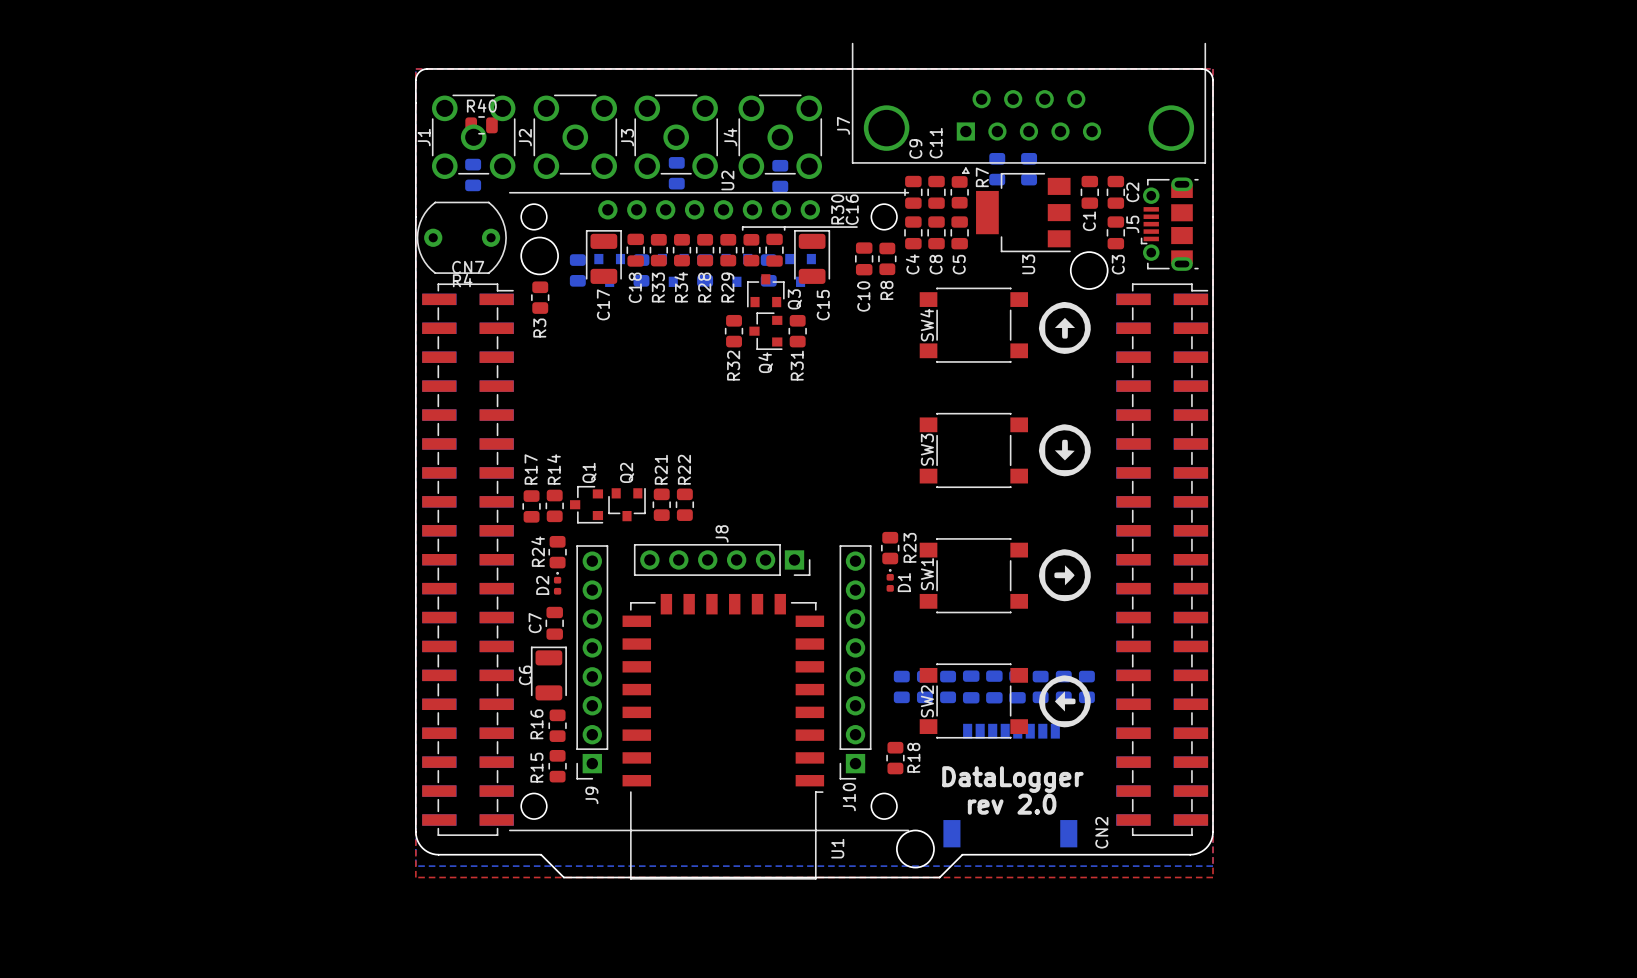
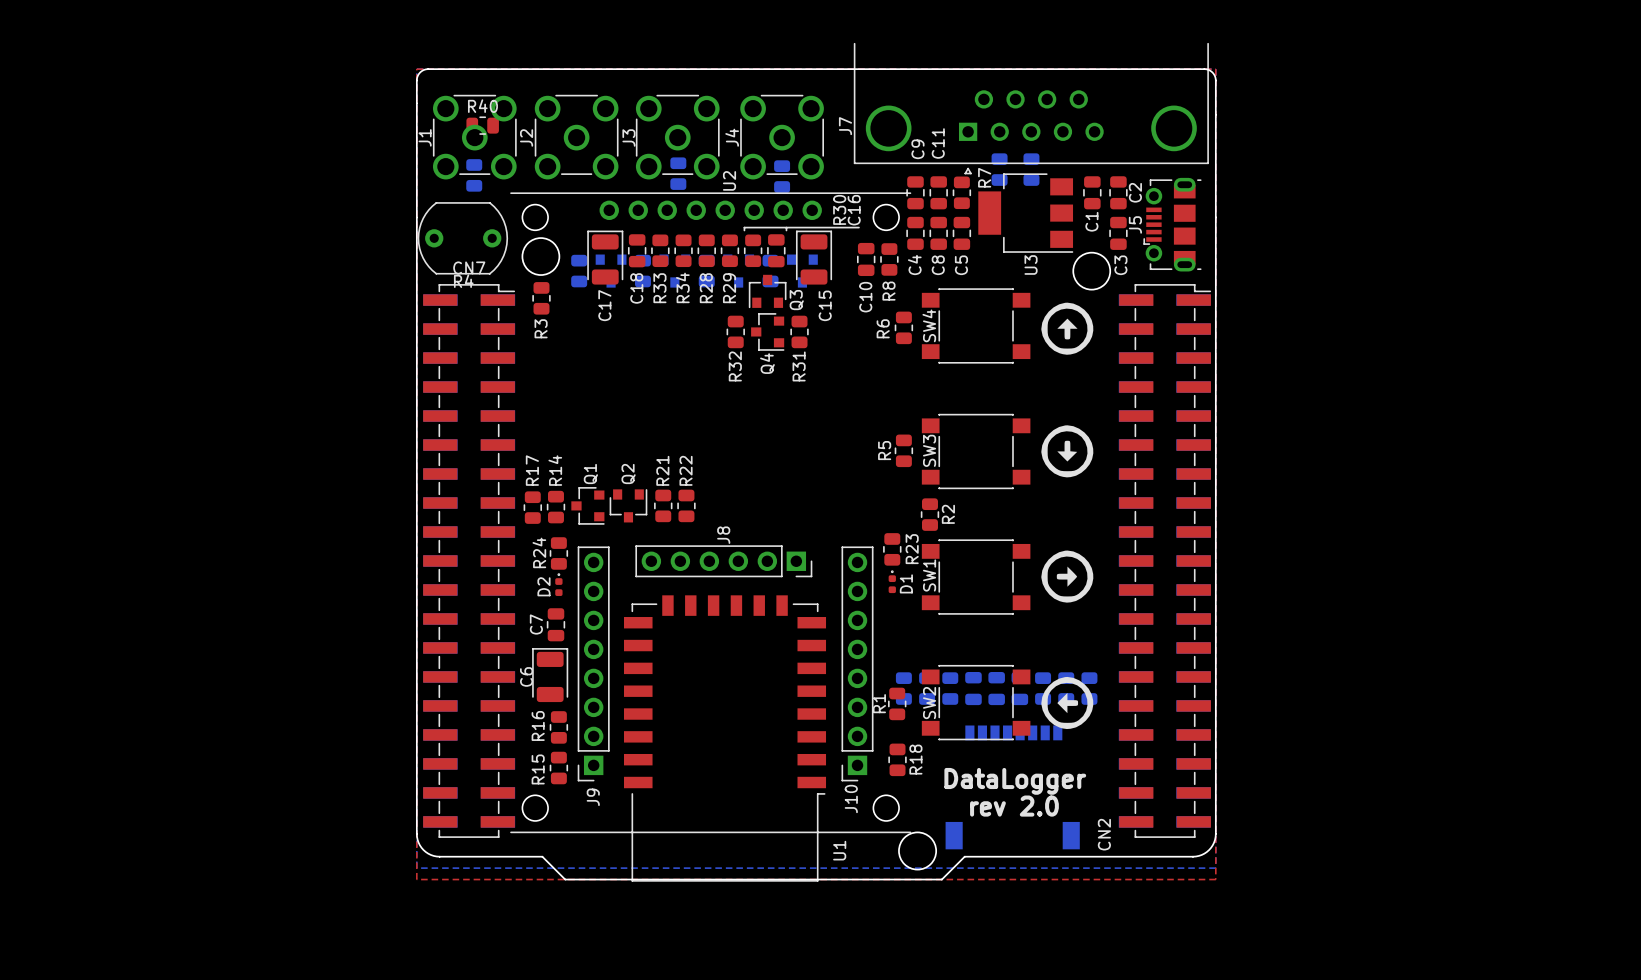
R6: none -> (903, 327)
R5: none -> (903, 450)
R2: none -> (929, 514)
R1: none -> (897, 703)

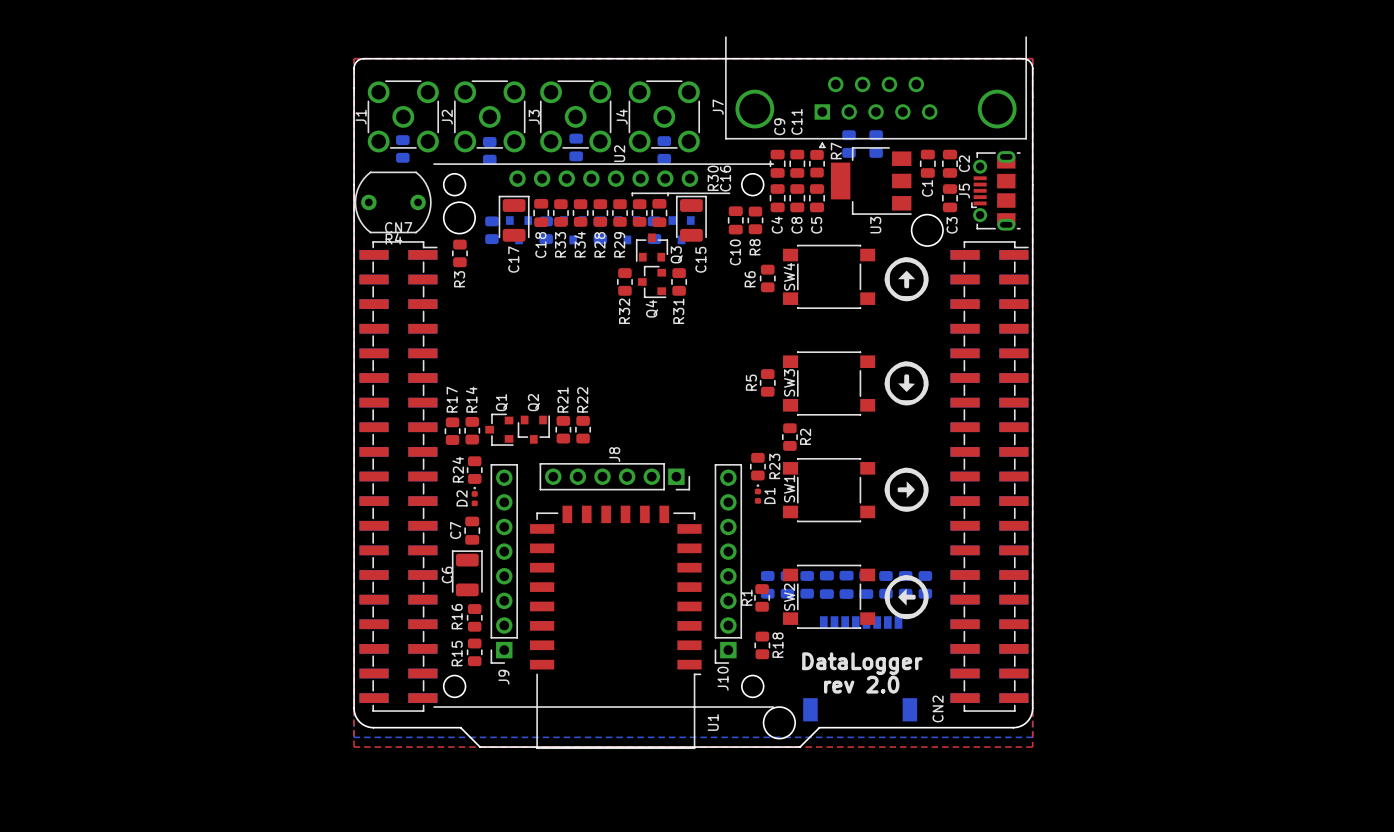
R40: (482, 125) -> none
part: none -> (489, 150)

